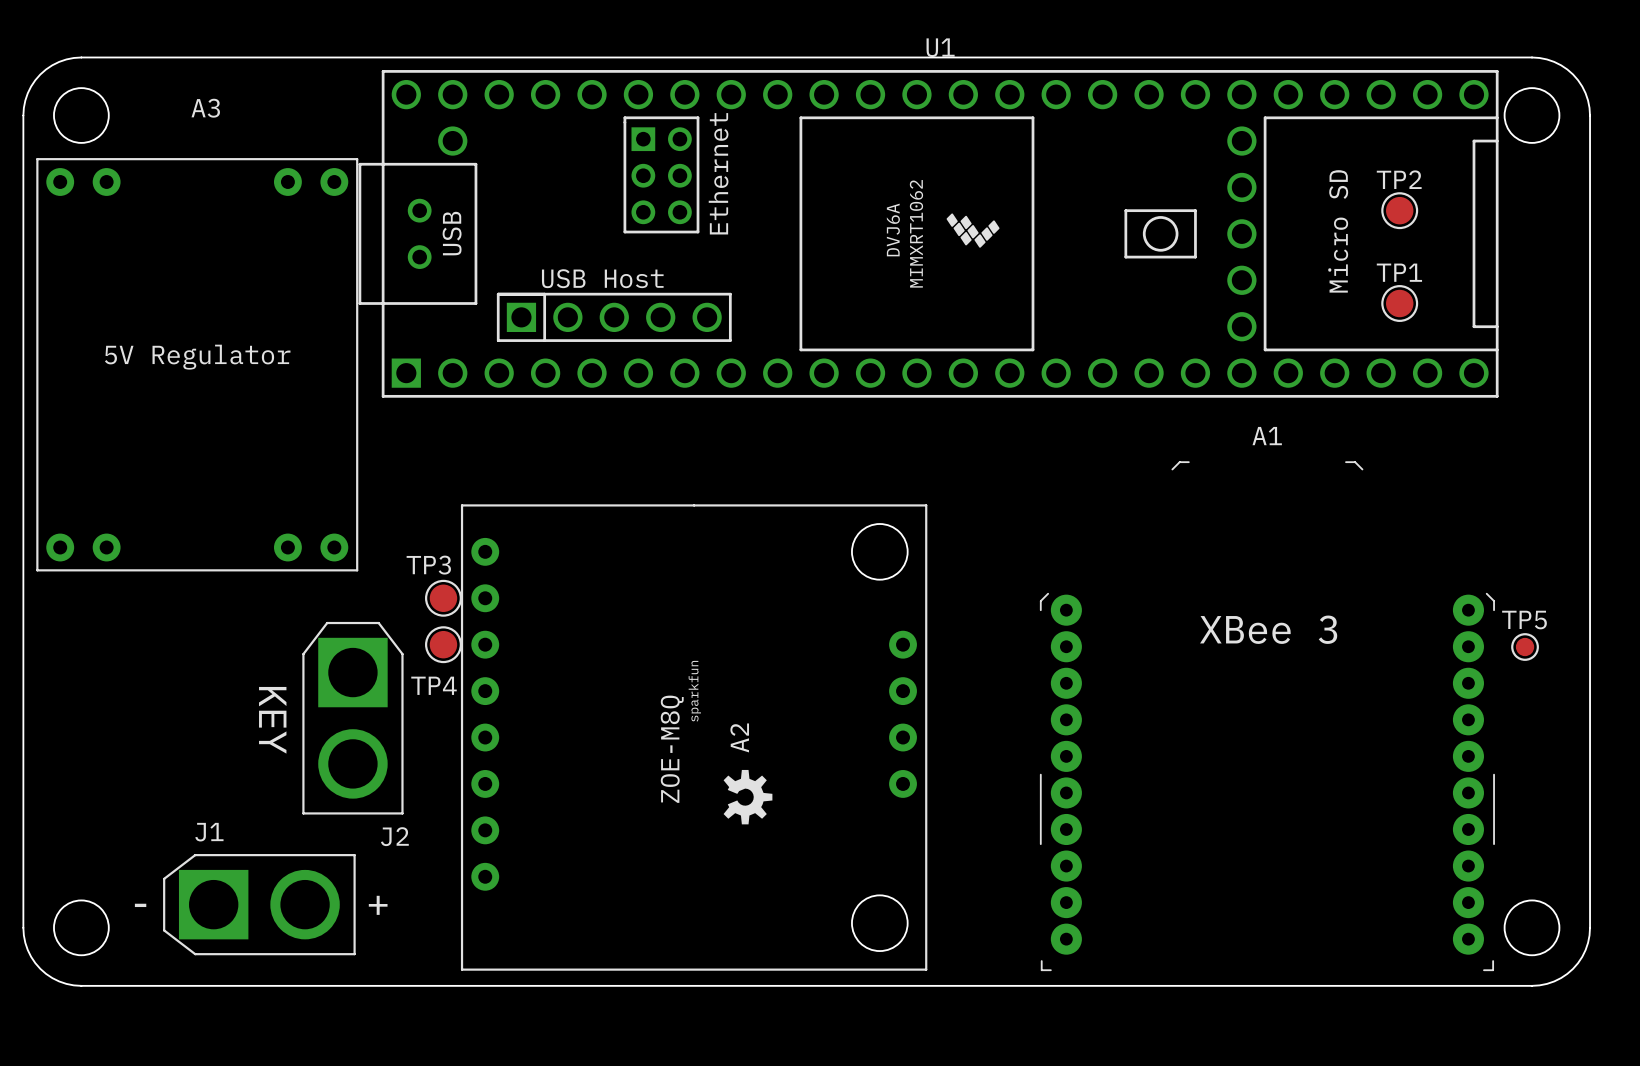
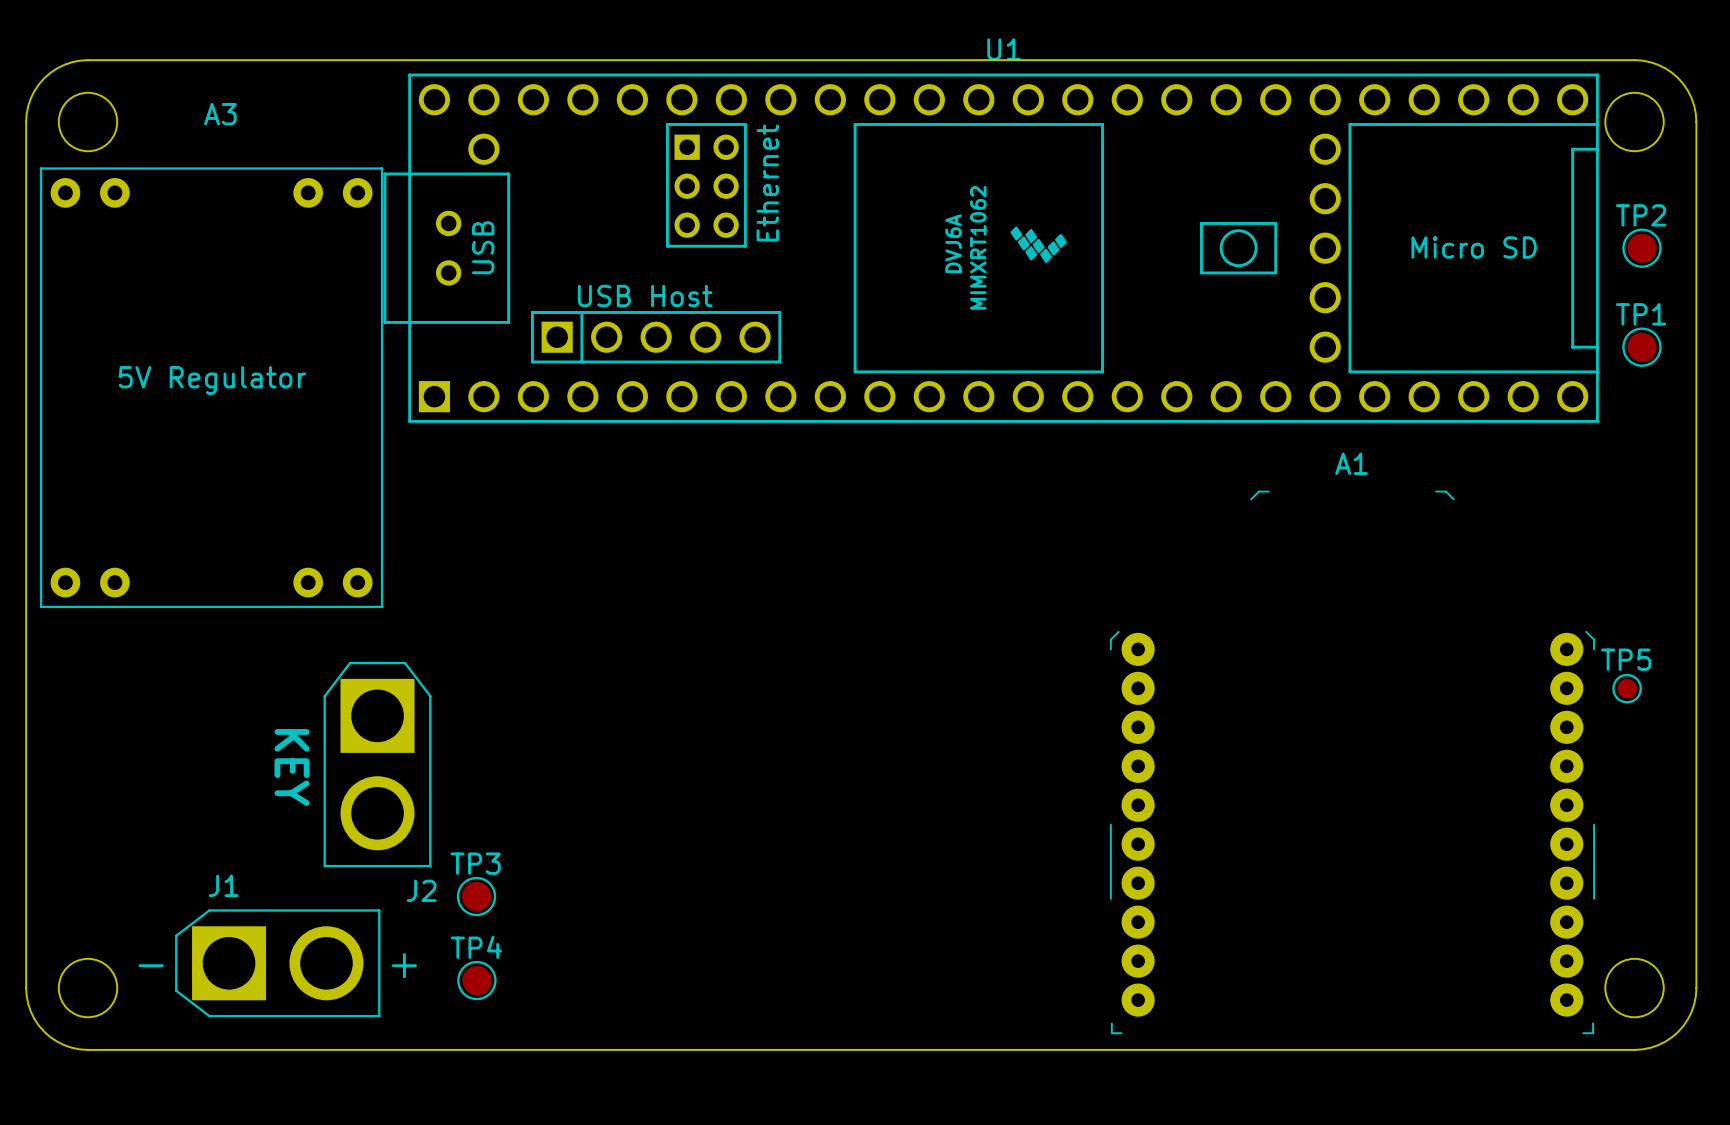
TP2 position: (1399, 210) -> (1641, 248)
U1 text rotation: 0° (1338, 231) -> 90° clockwise (1474, 247)
TP1 position: (1399, 303) -> (1641, 347)
TP3 name position: TP3 (428, 565) -> TP3 (475, 863)
TP3 position: (443, 598) -> (476, 896)
text: XBee 3 (1268, 629) -> none
TP4 position: (443, 644) -> (476, 980)
TP4 name position: TP4 (434, 685) -> TP4 (476, 947)
A2: (694, 737) -> none

